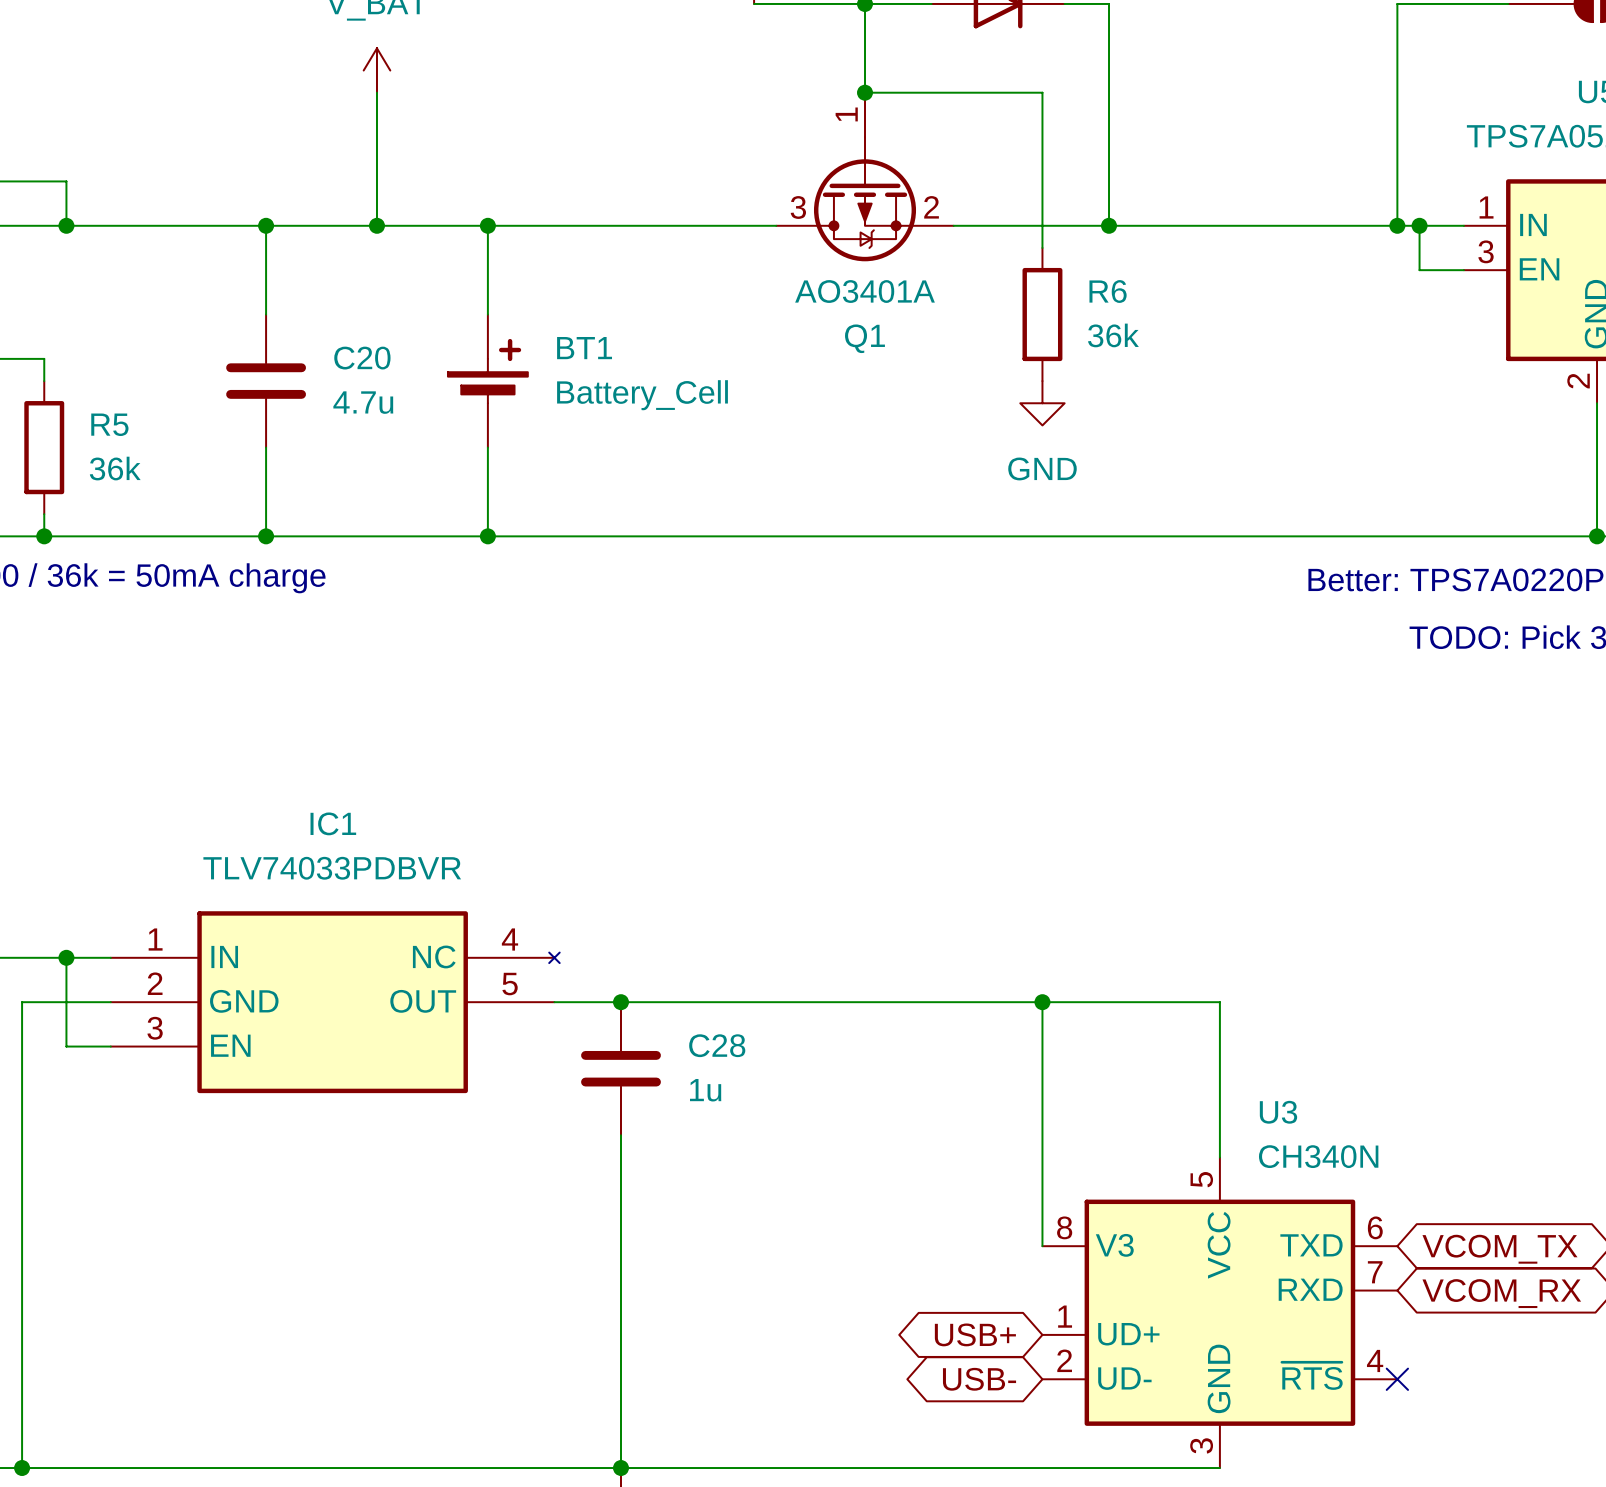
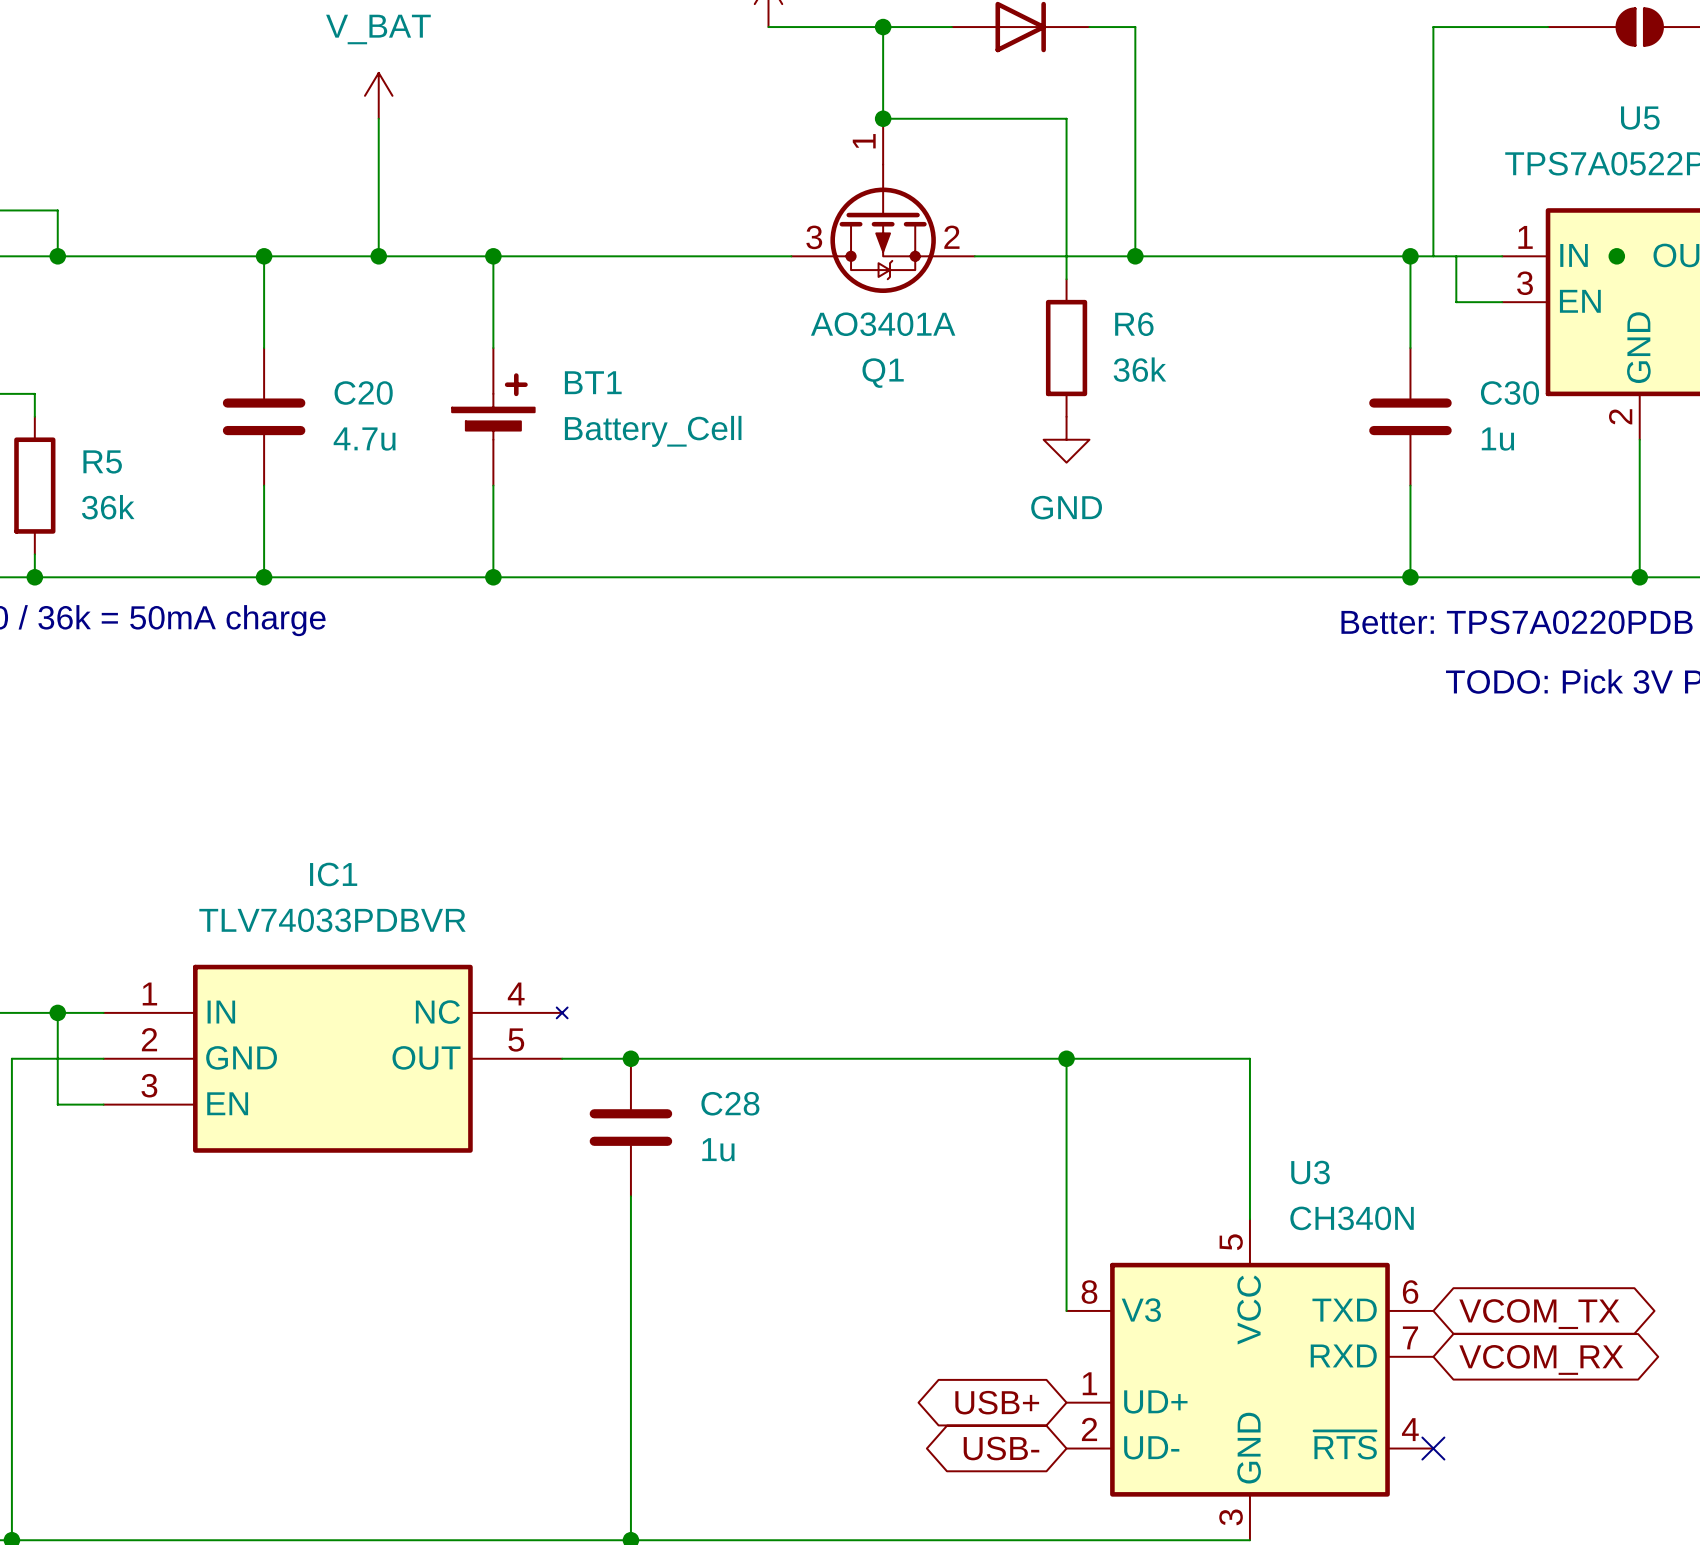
wire: none -> (1410, 256) (1410, 348)
junction: none -> (1410, 256)
junction: (1397, 225) -> none
junction: (1419, 225) -> none
junction: none -> (1616, 256)
C30: none -> 1u (1410, 416)
wire: none -> (1410, 485) (1410, 577)
junction: none -> (1410, 577)

